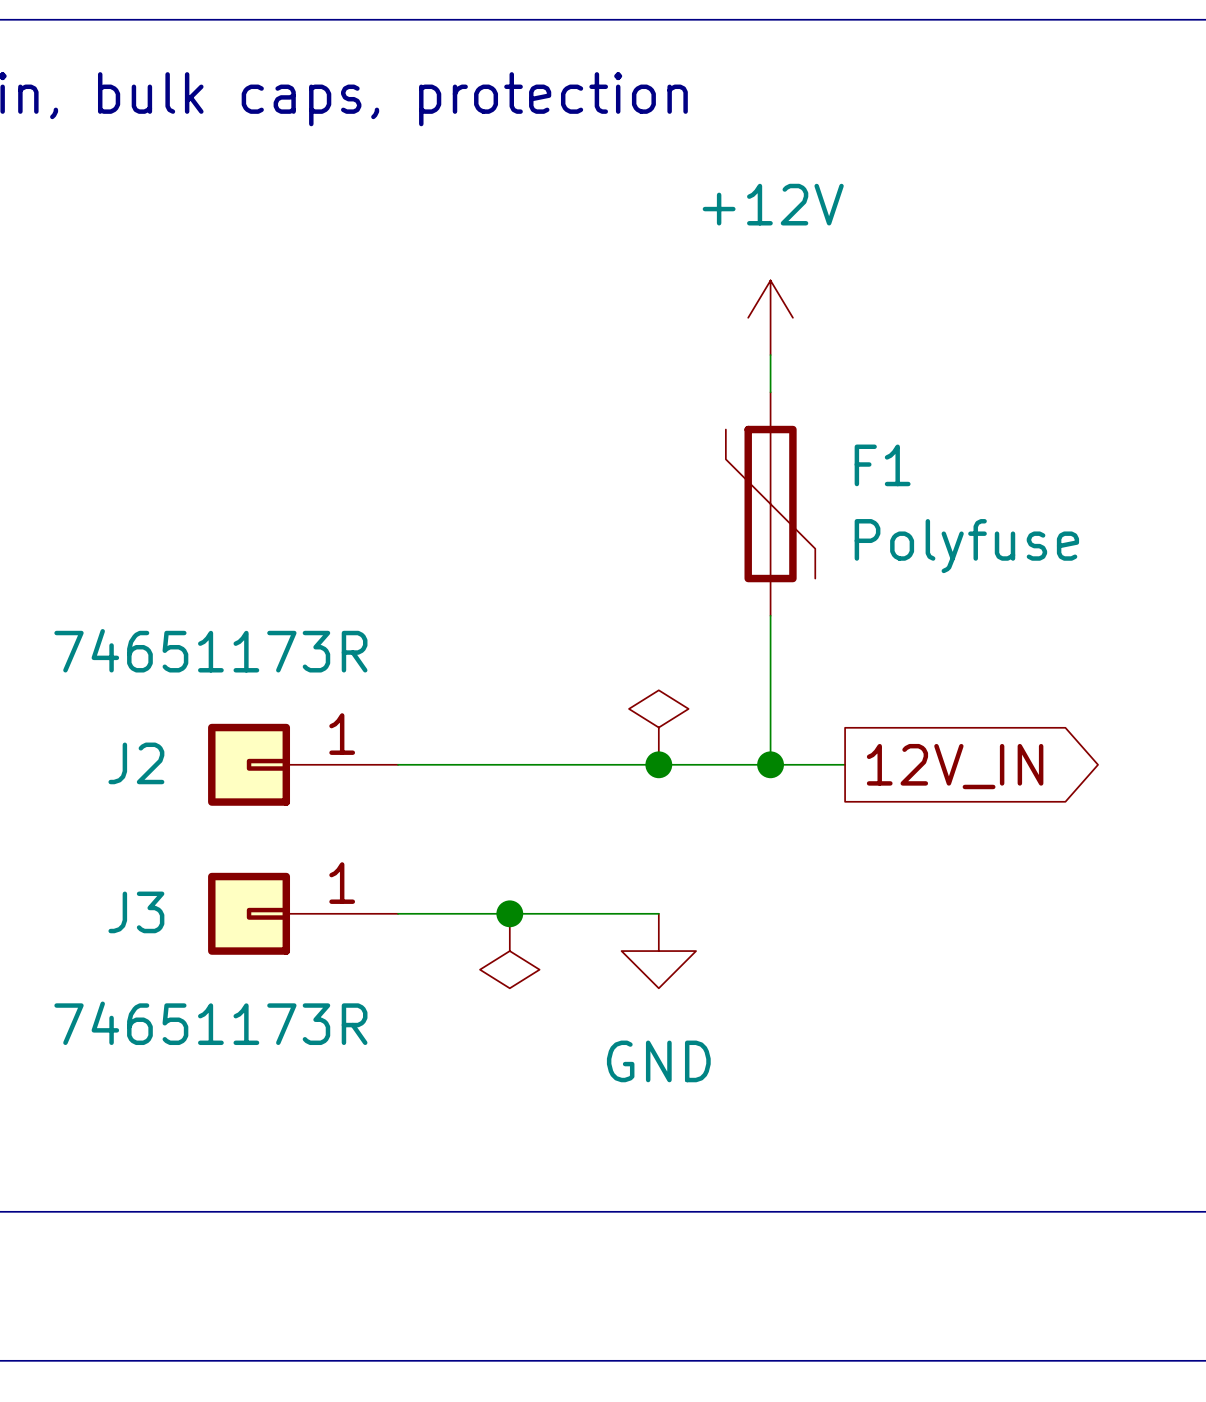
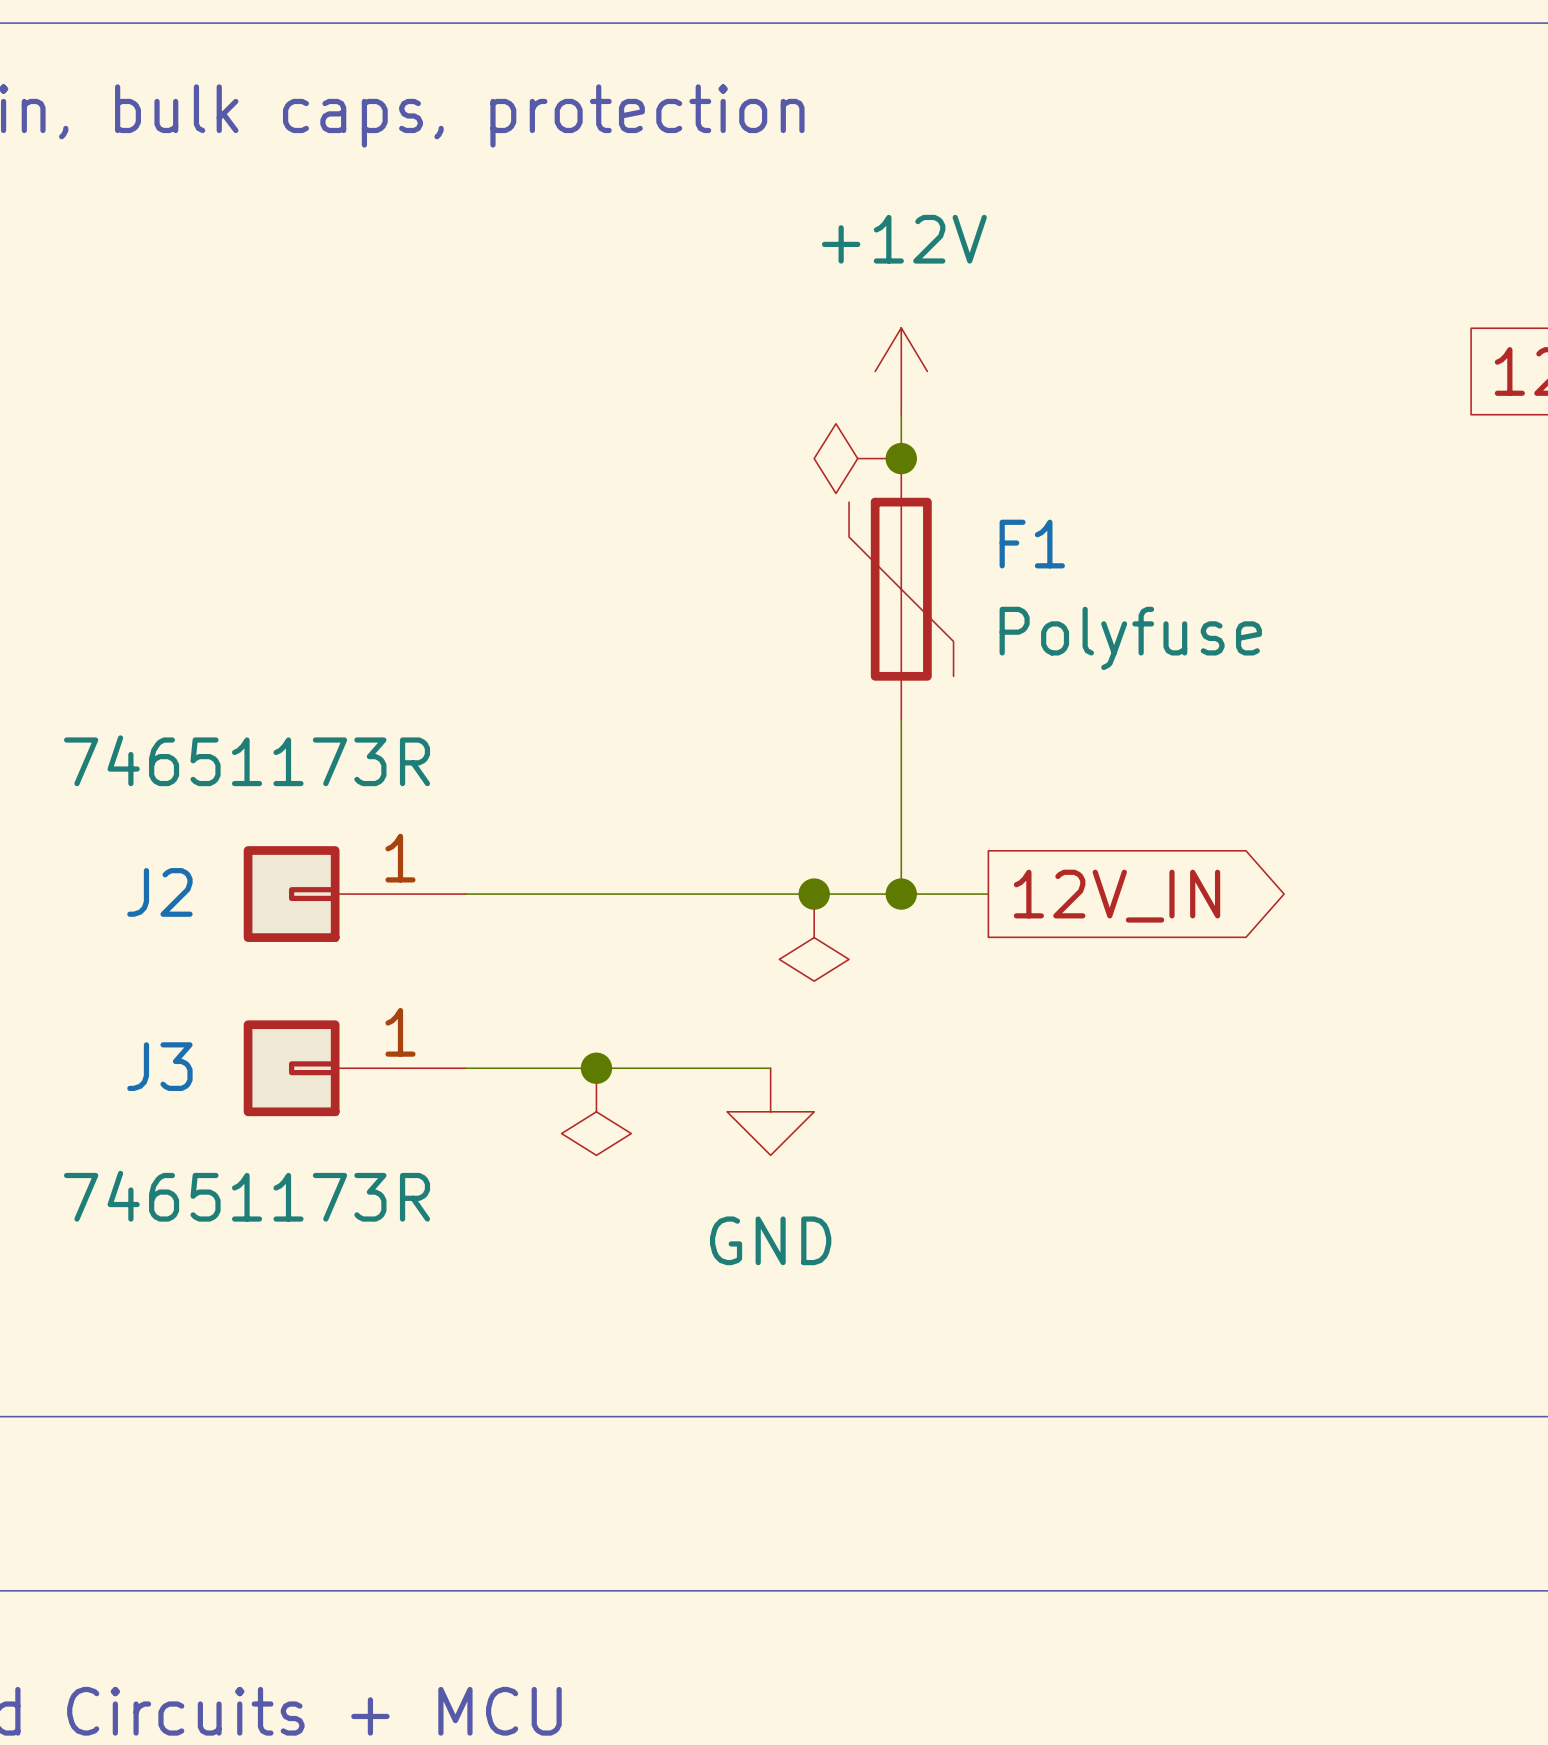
power symbol: none -> (857, 458)
junction: none -> (901, 458)
power symbol rotation: 0° (658, 727) -> 180° (814, 937)
power symbol position: (658, 727) -> (814, 937)
junction position: (658, 764) -> (814, 894)

